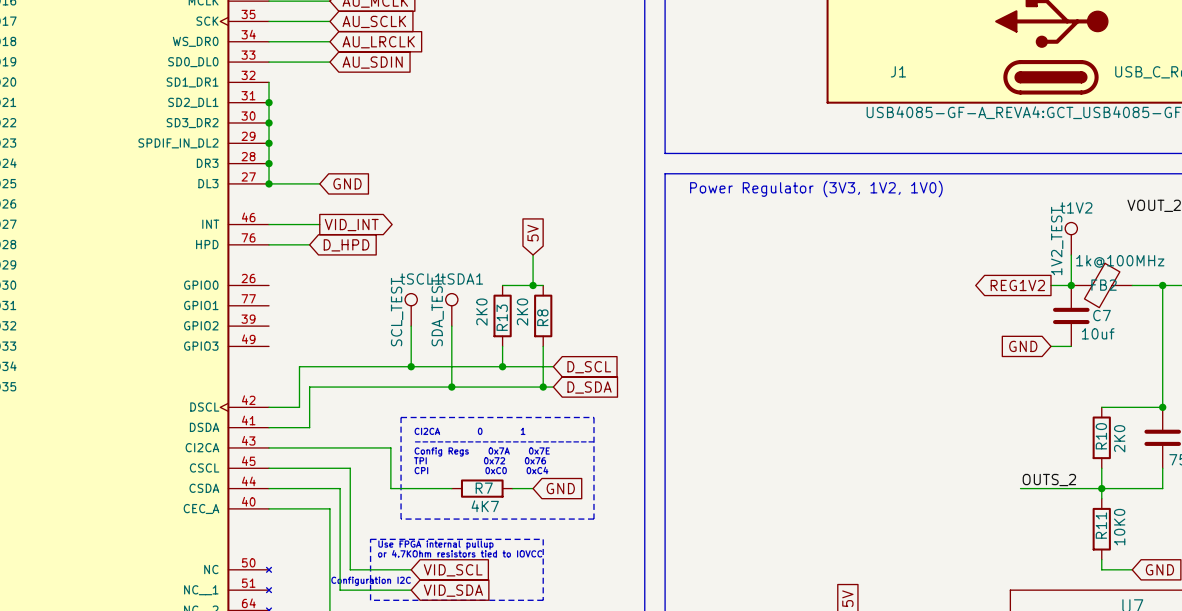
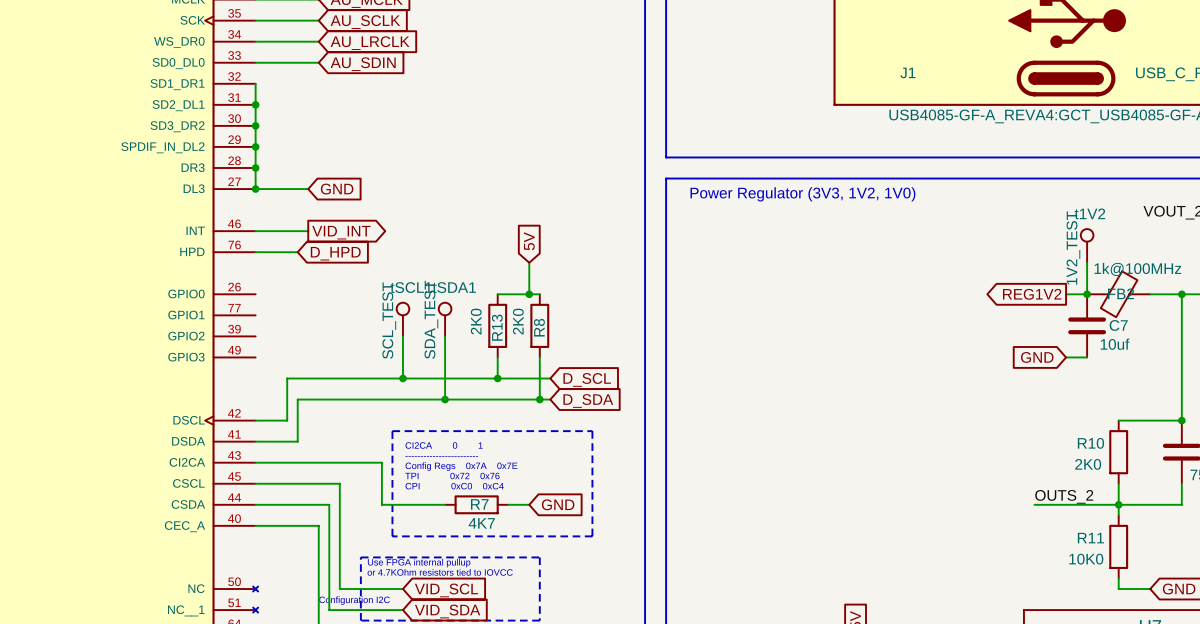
R10 name rotation: 0° (1101, 436) -> 90° clockwise (1090, 443)
R10 value rotation: 0° (1119, 438) -> 90° clockwise (1088, 464)
R10 value position: 2K0 (1119, 438) -> 2K0 (1088, 464)
R11 name rotation: 0° (1101, 525) -> 90° clockwise (1090, 538)
R11 value rotation: 0° (1119, 527) -> 90° clockwise (1086, 559)
R11 value position: 10K0 (1119, 527) -> 10K0 (1086, 559)

